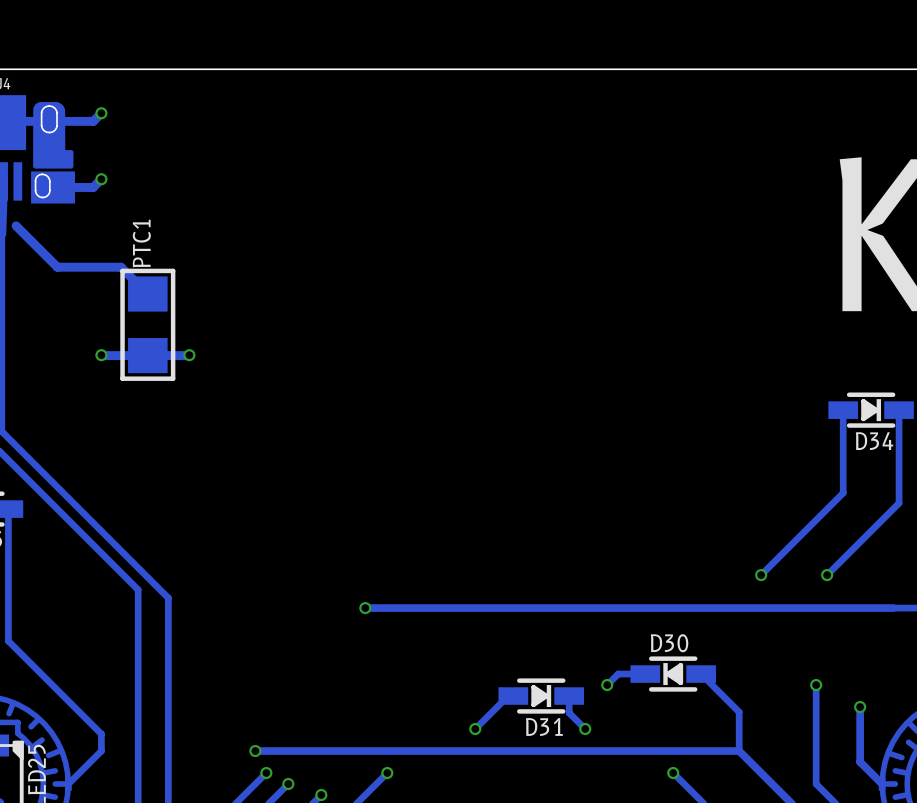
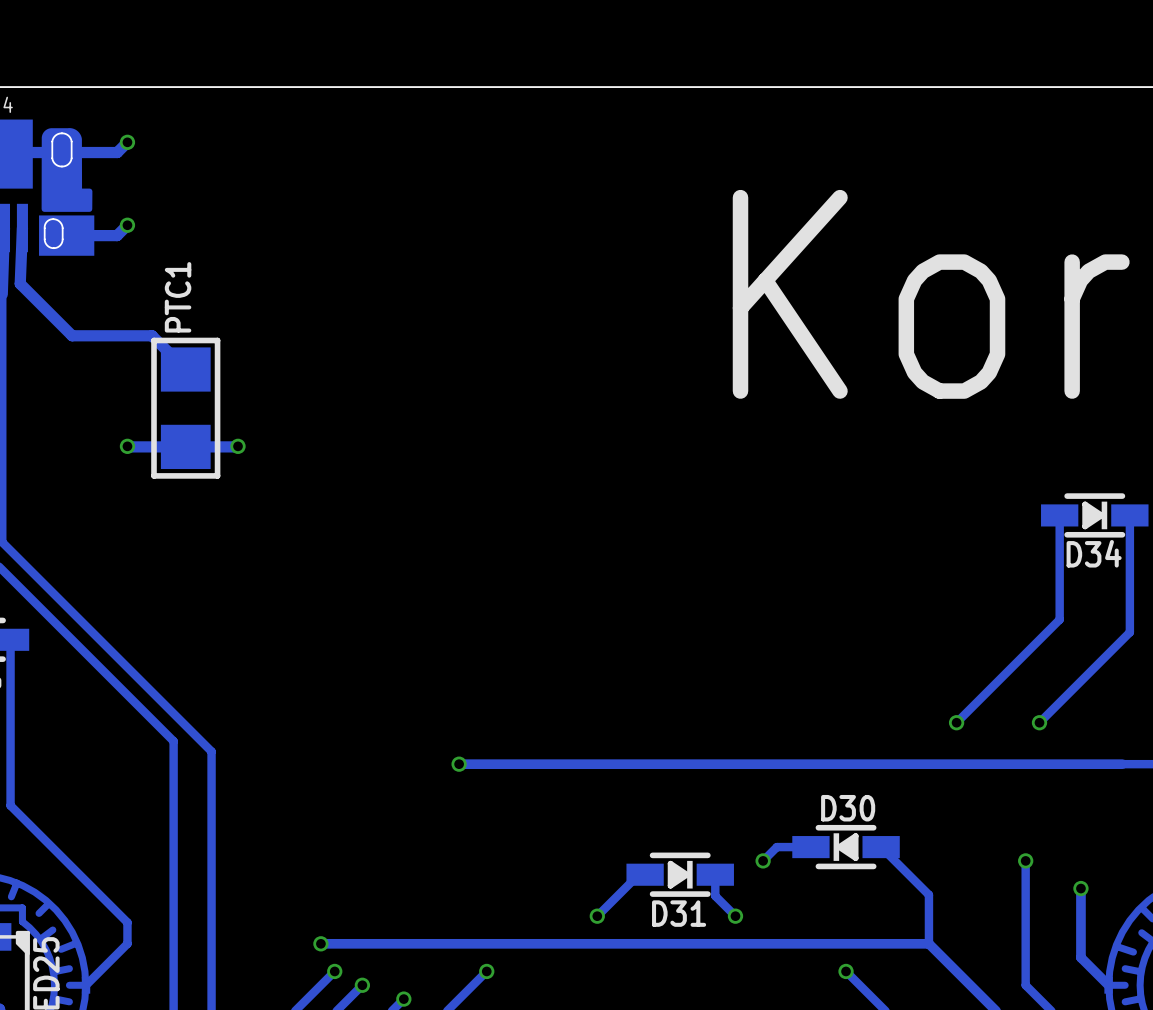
track: none -> (22, 228) (20, 283)

